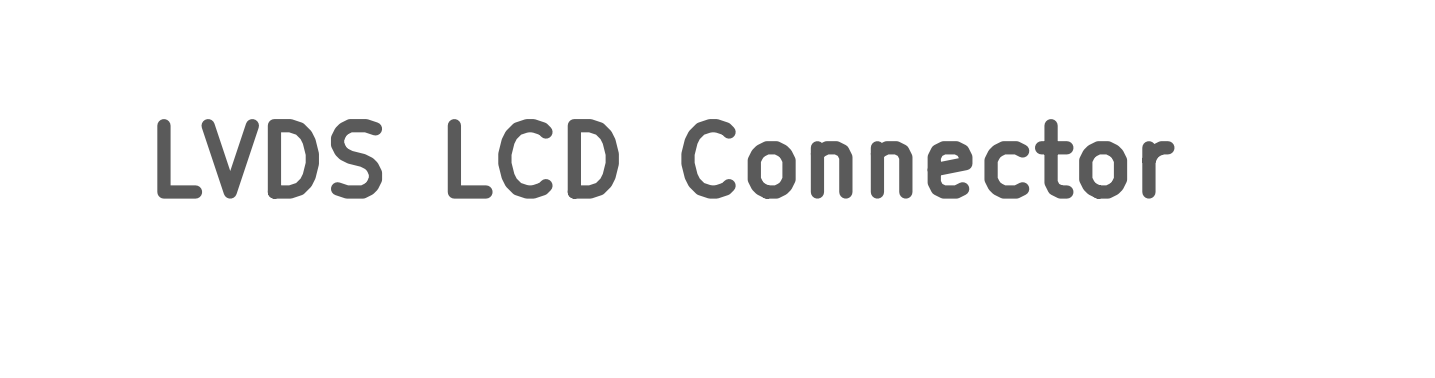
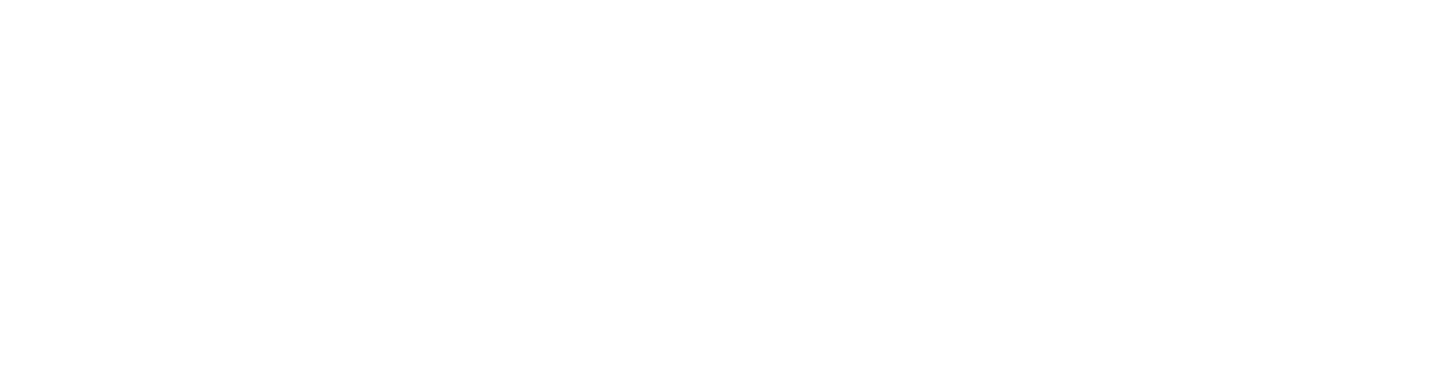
text: LVDS LCD Connector (665, 158) -> none

